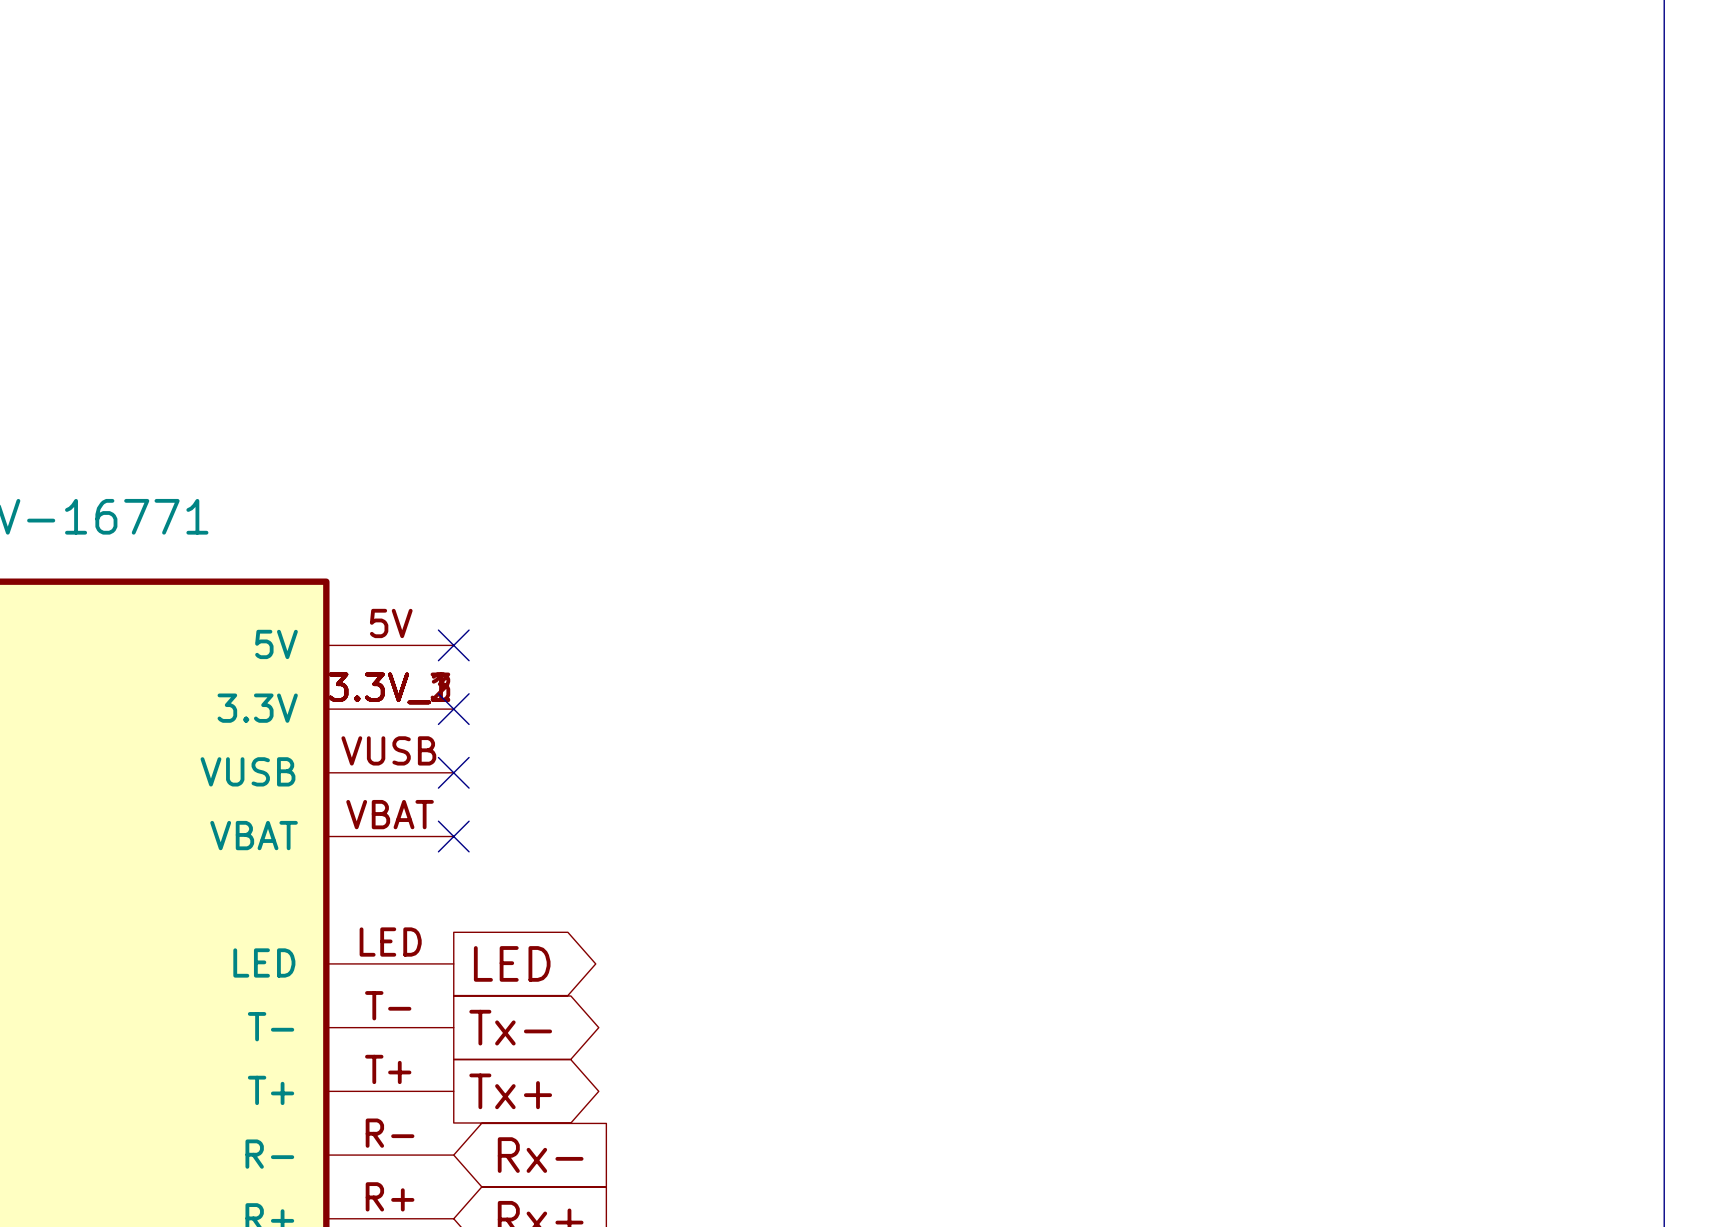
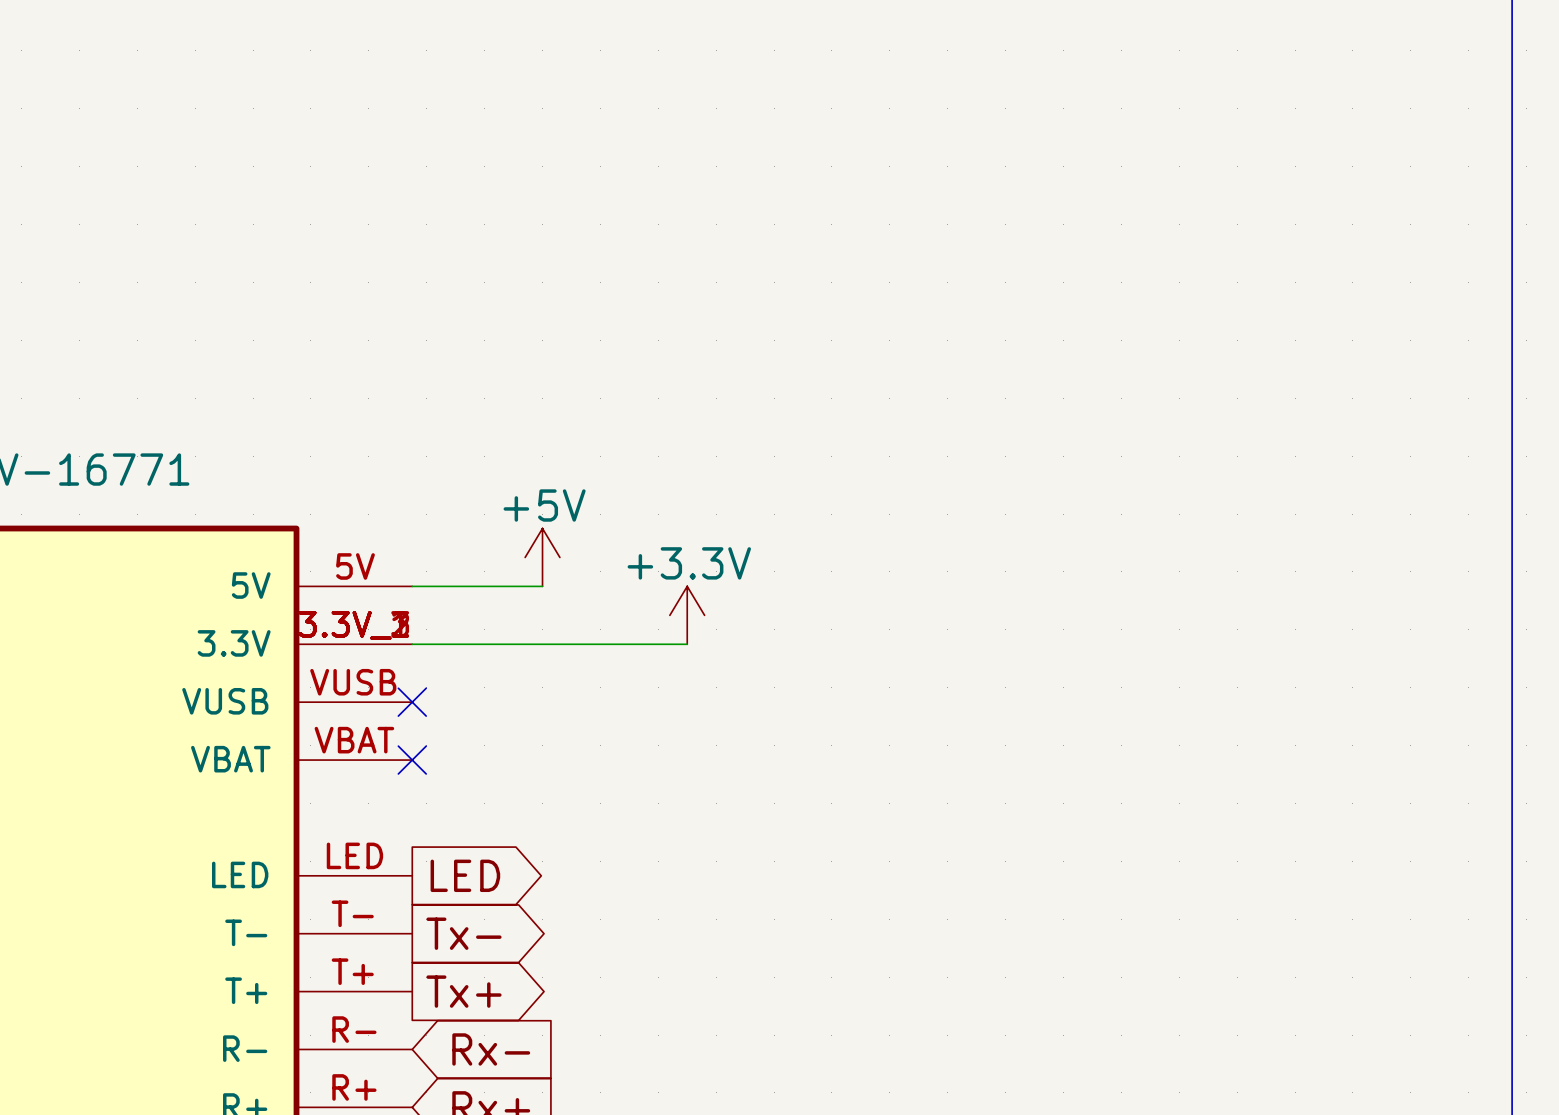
power symbol: none -> +5V (542, 557)
wire: none -> (412, 586) (542, 586)
no-connect mark: (453, 645) -> none
power symbol: none -> +3.3V (687, 615)
wire: none -> (412, 644) (687, 644)
no-connect mark: (453, 709) -> none

